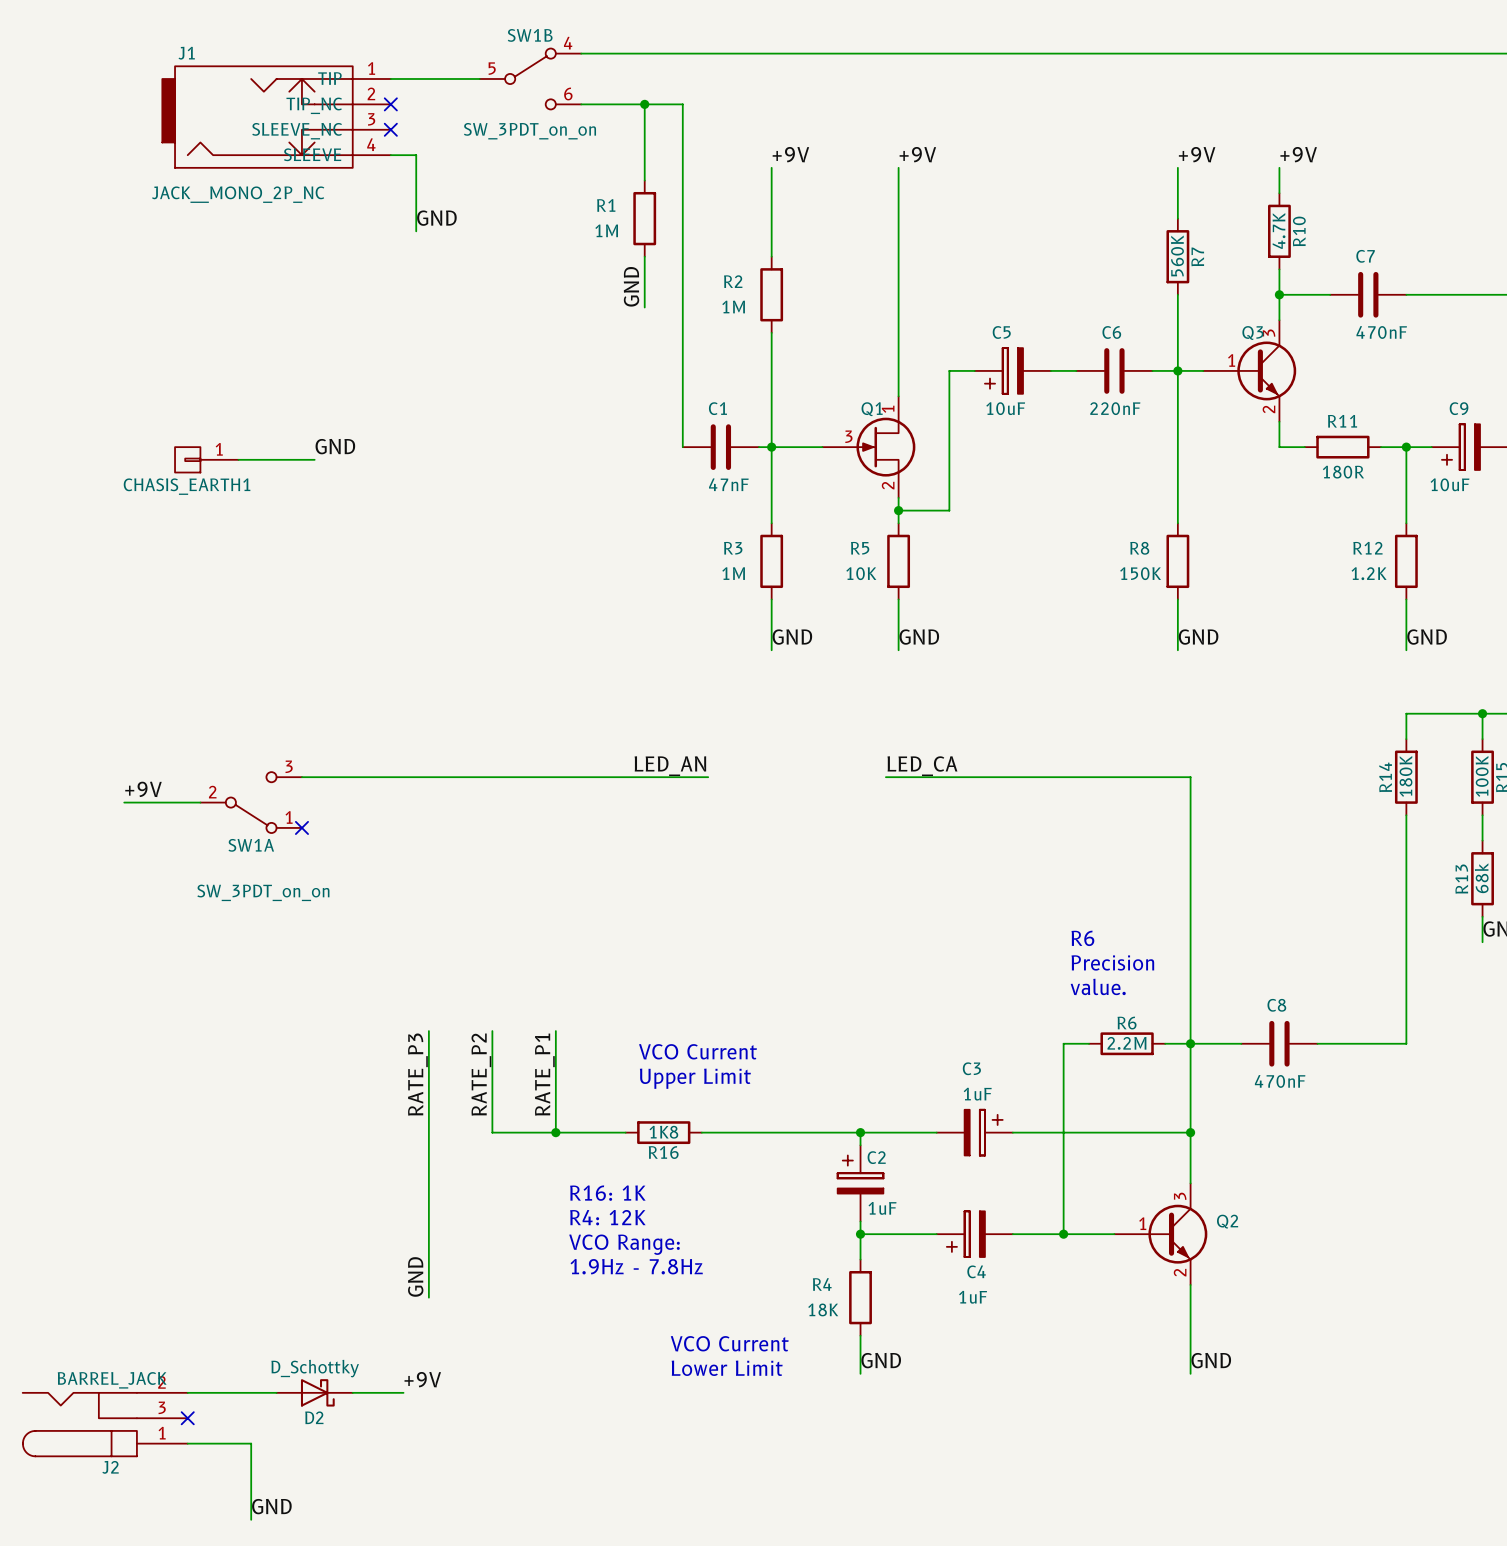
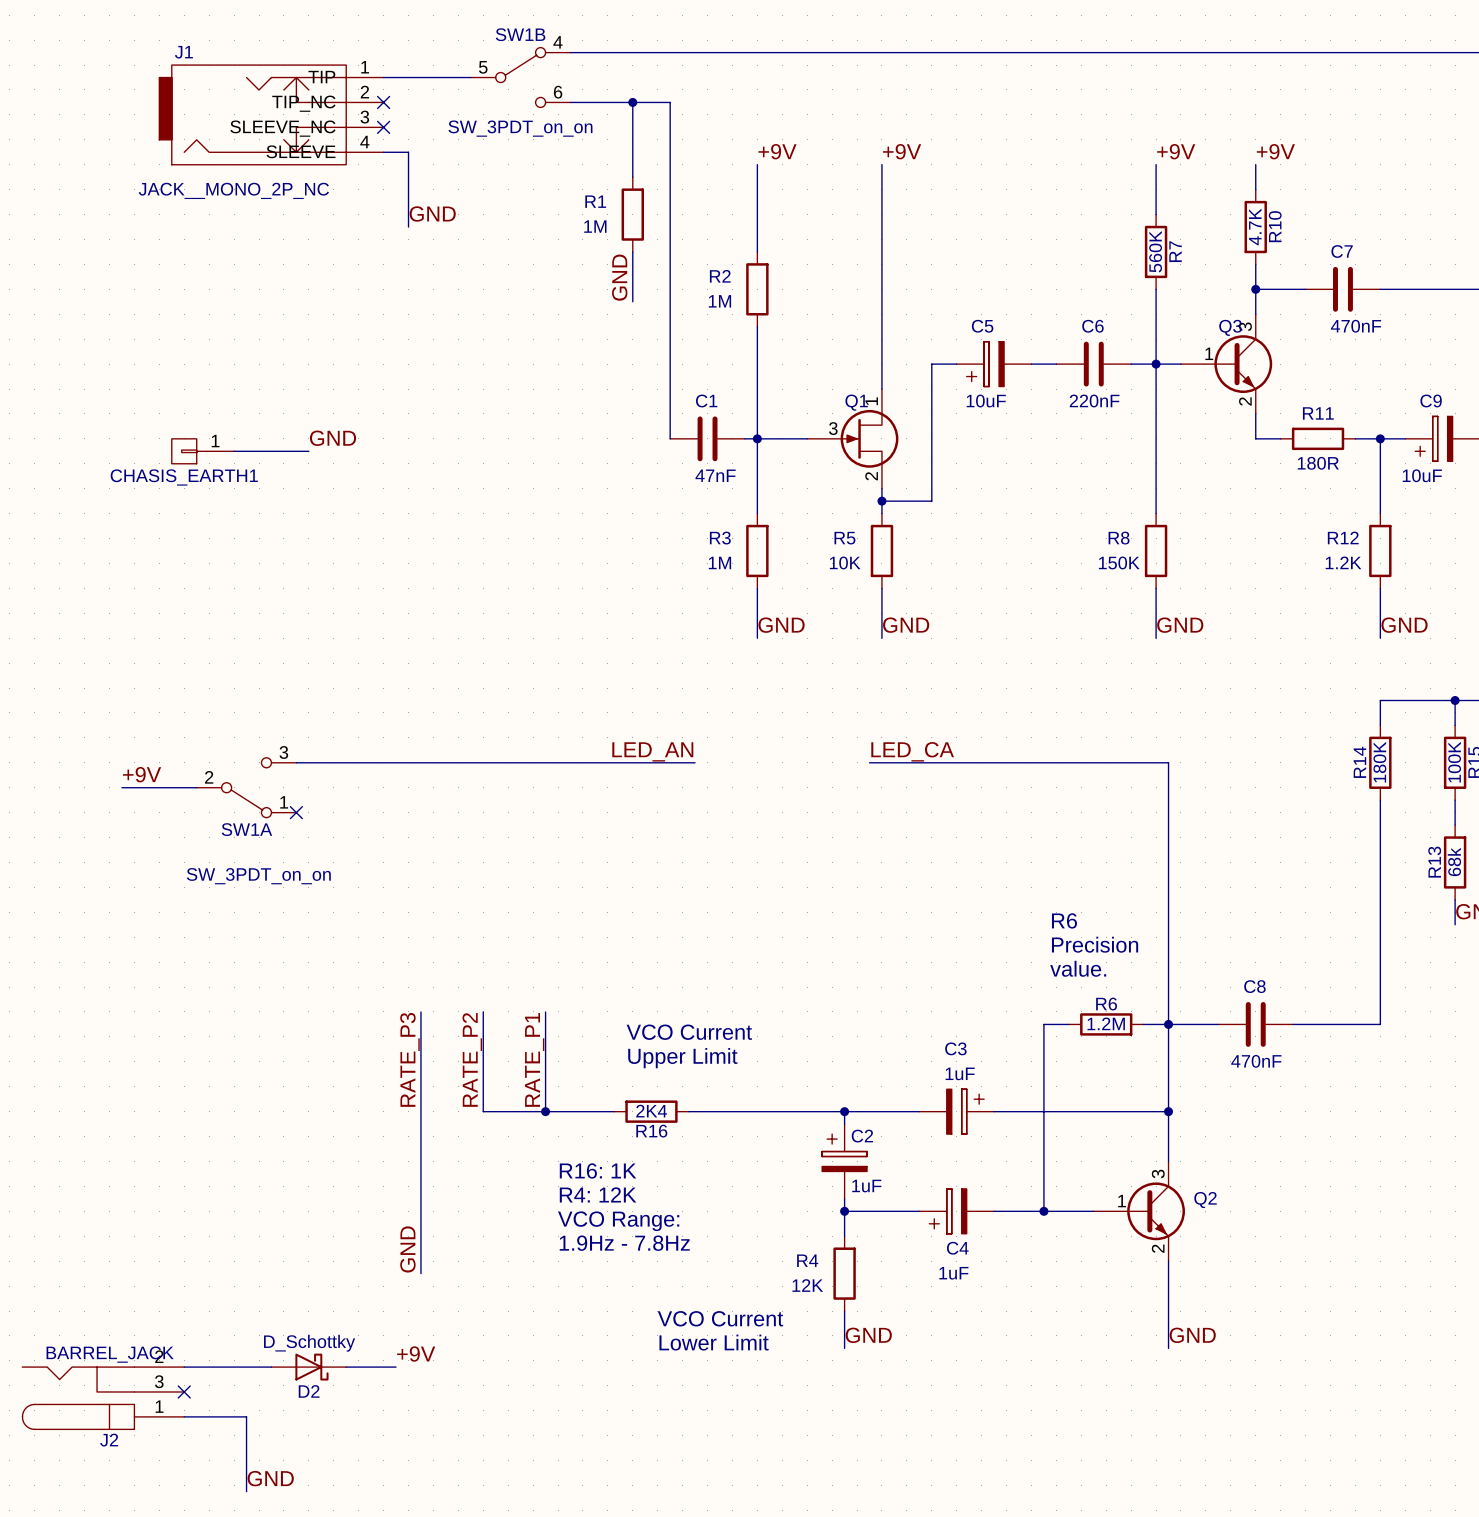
R6 value: 2.2M (1126, 1043) -> 1.2M (1106, 1023)
R16 value: 1K8 (663, 1132) -> 2K4 (651, 1111)
R4 value: 18K (823, 1309) -> 12K (807, 1285)

